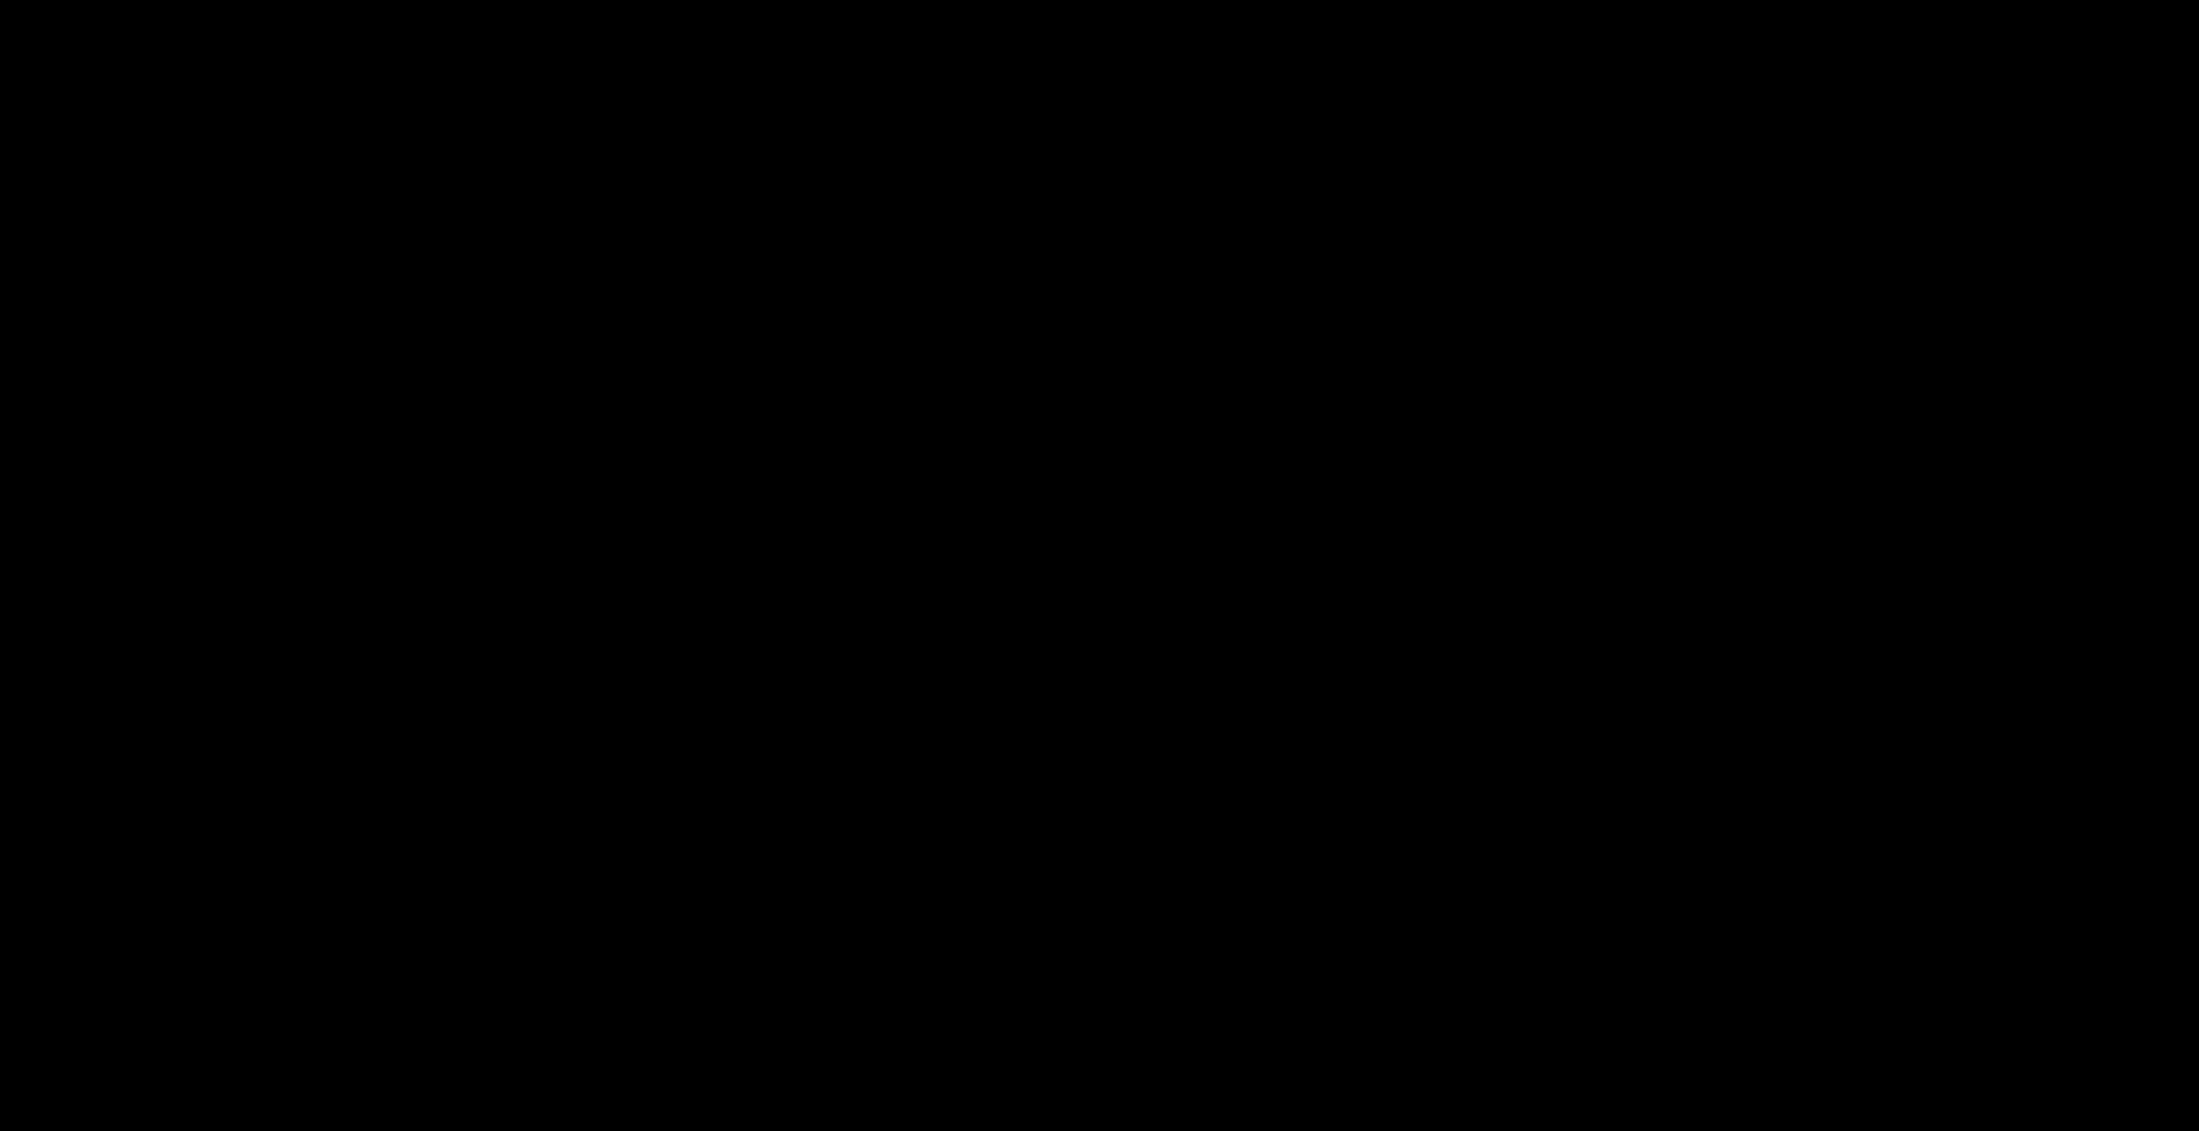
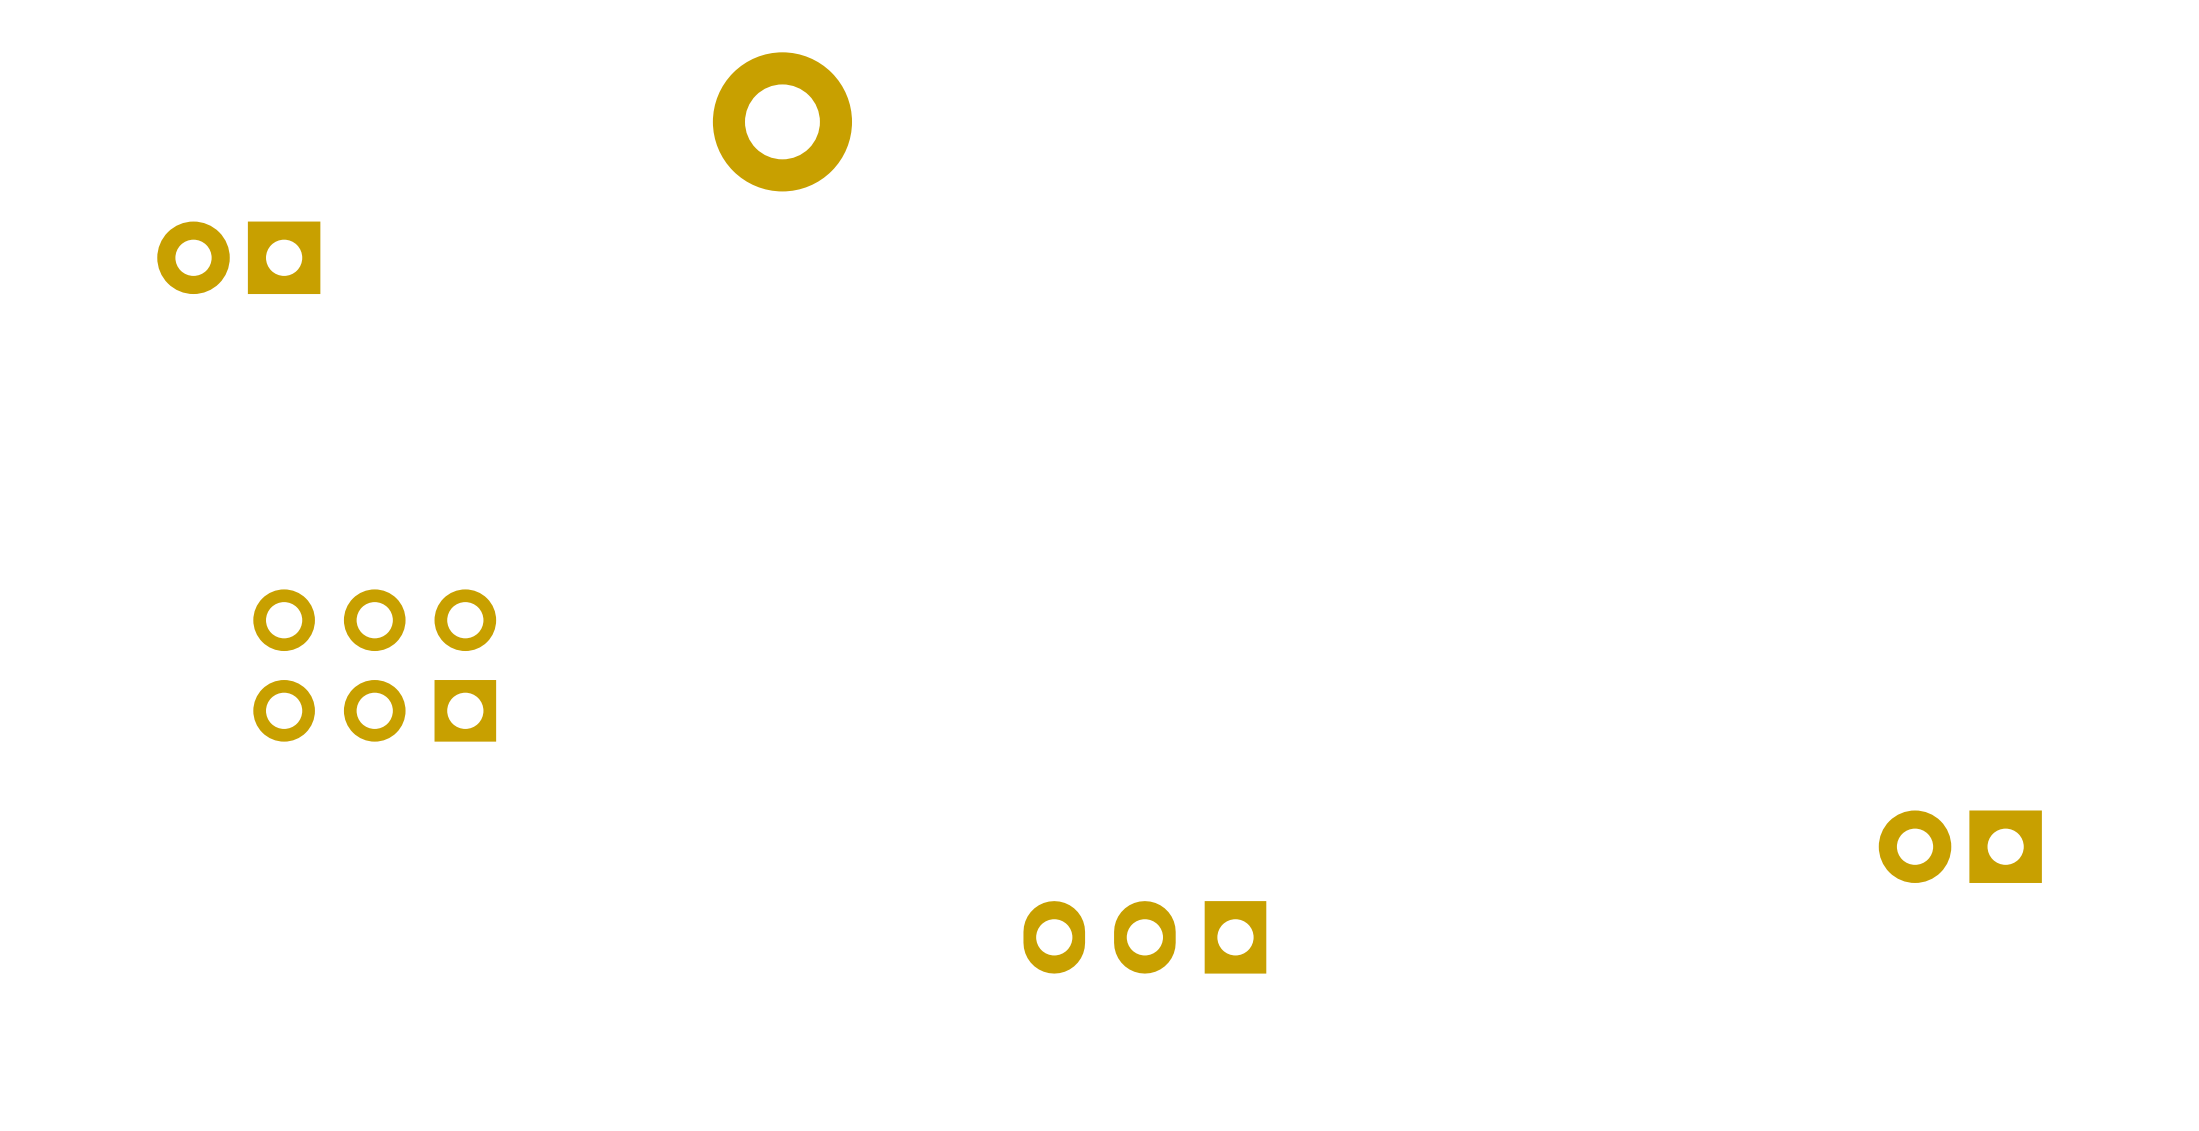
part: none -> (782, 121)
part: none -> (238, 257)
part: none -> (374, 665)
part: none -> (1960, 846)
part: none -> (1144, 937)

